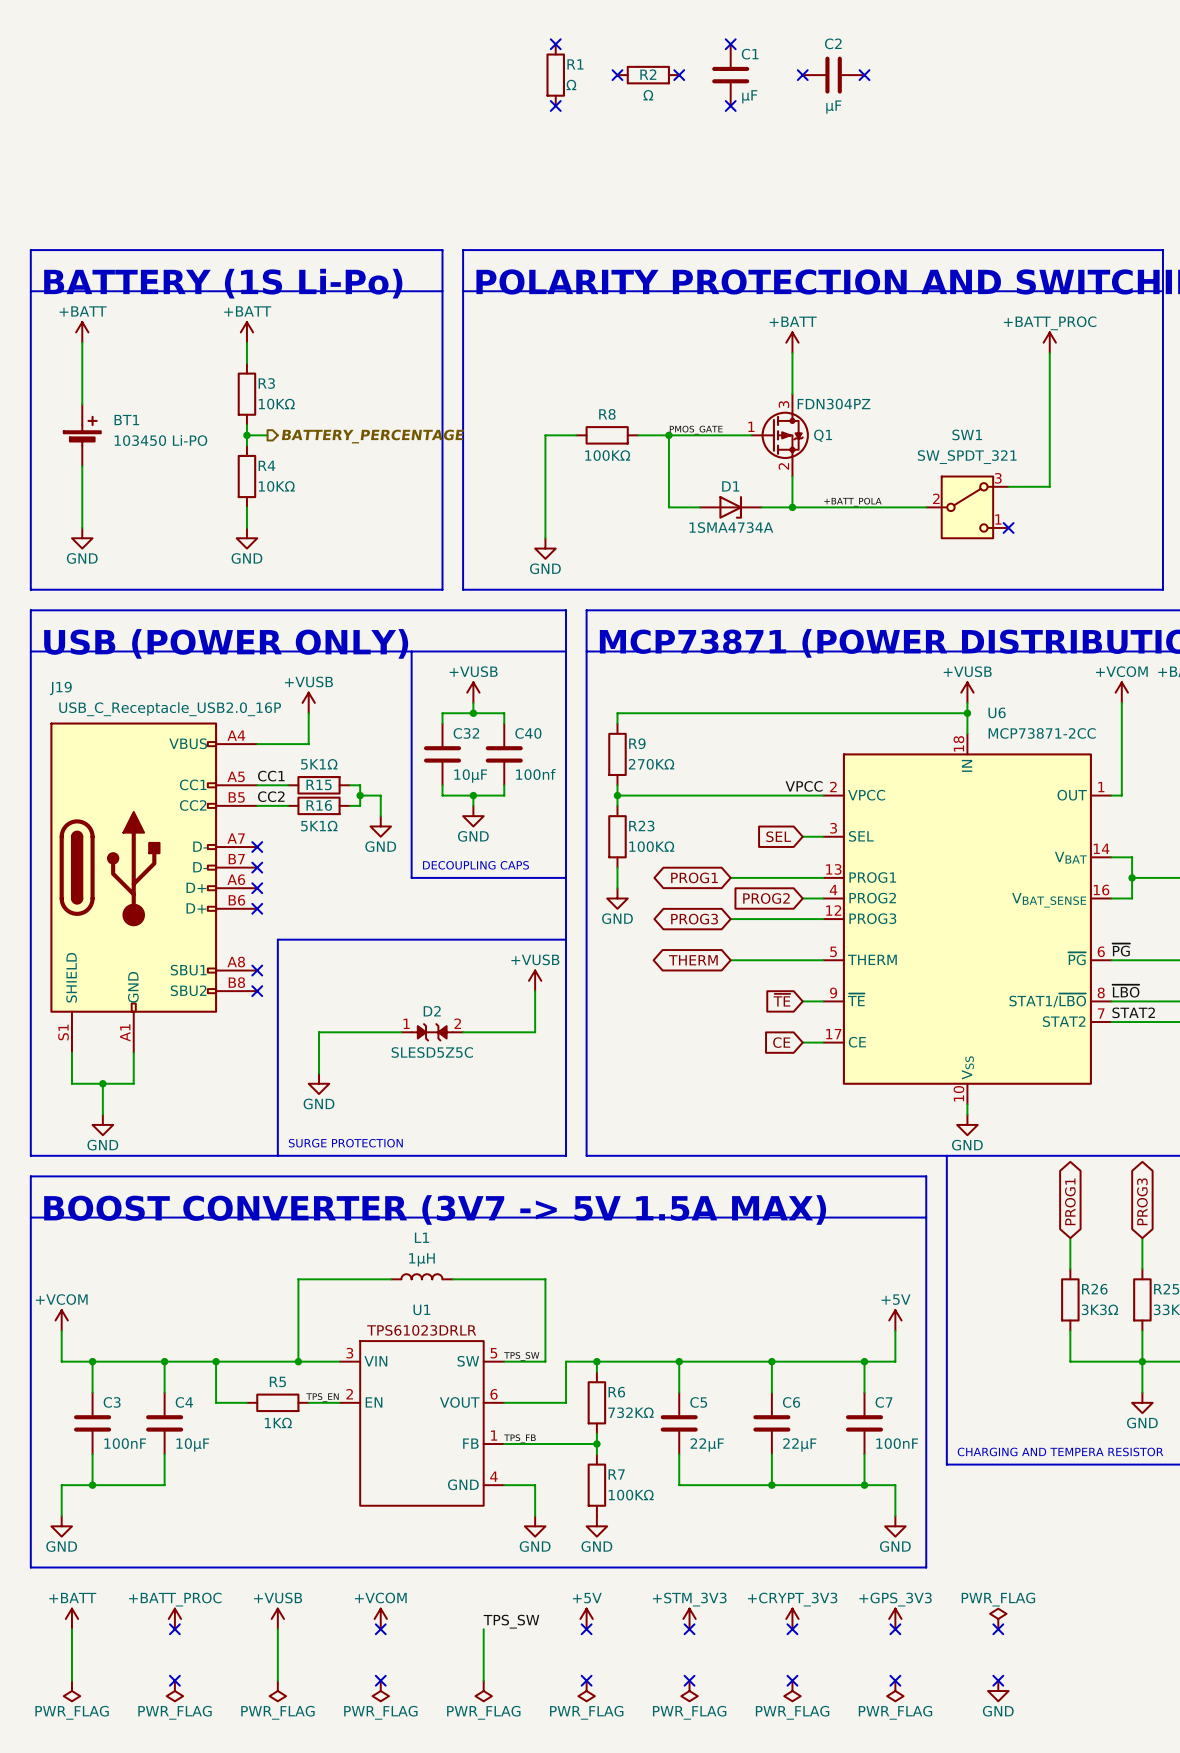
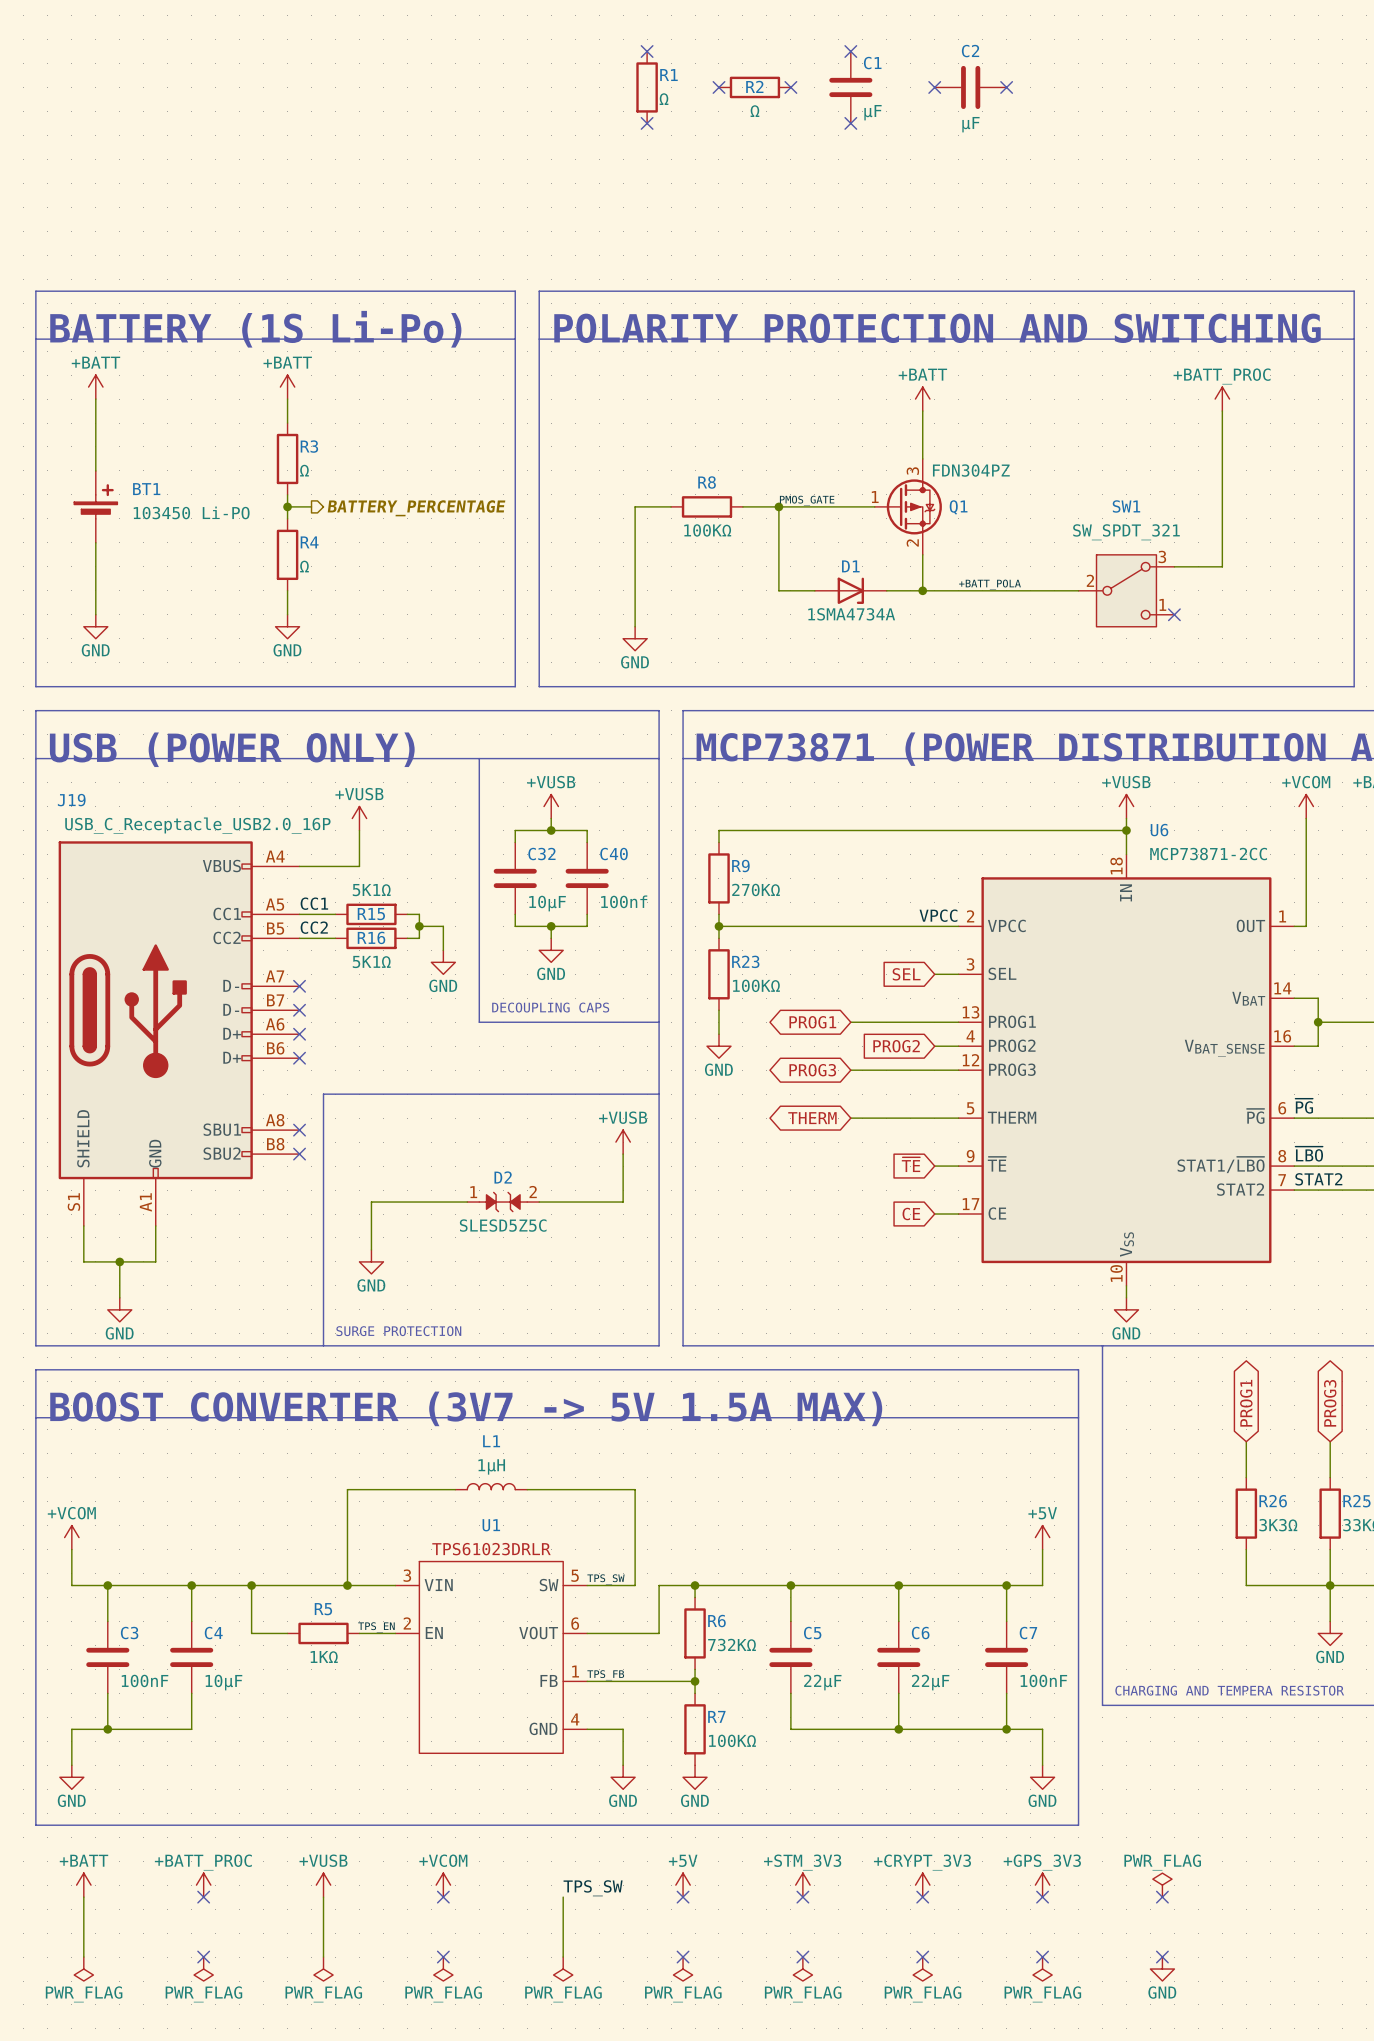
R3 value: 10KΩ (276, 404) -> Ω (304, 470)
R4 value: 10KΩ (276, 486) -> Ω (304, 566)

